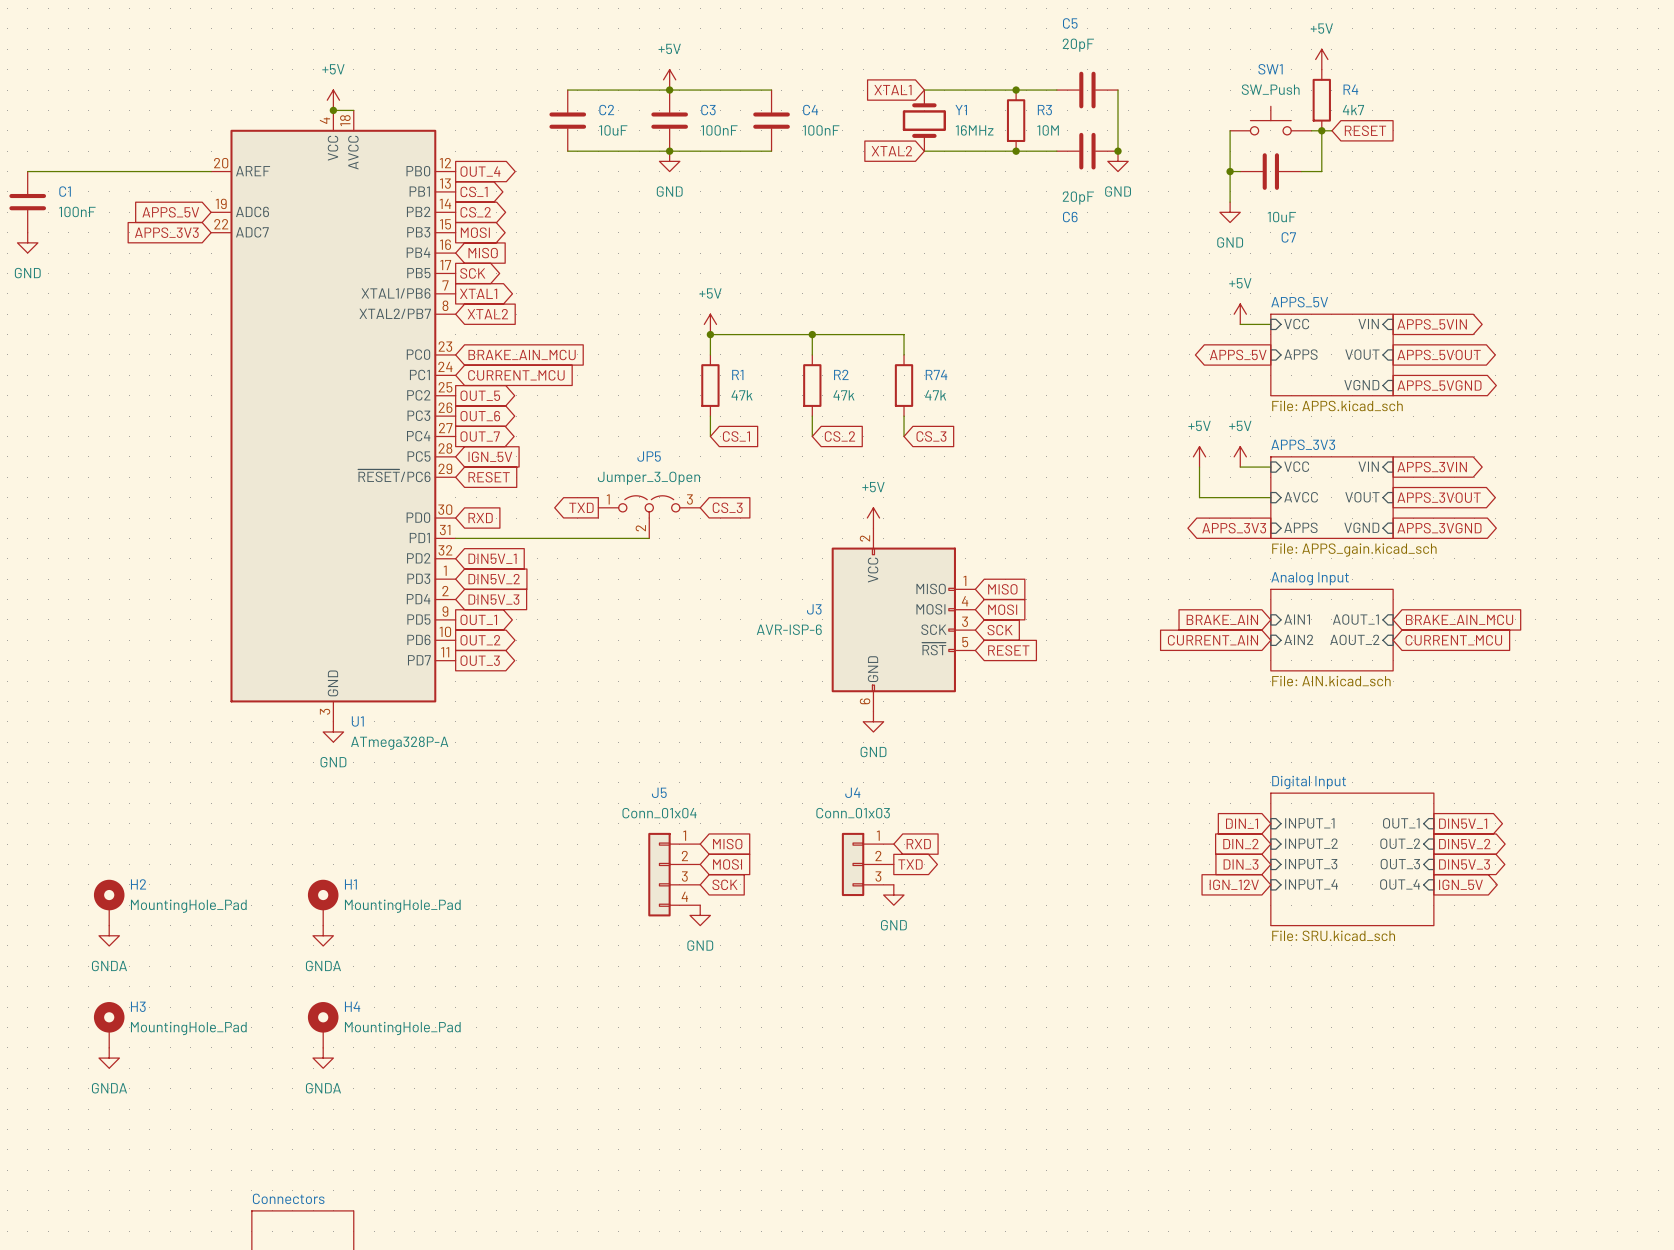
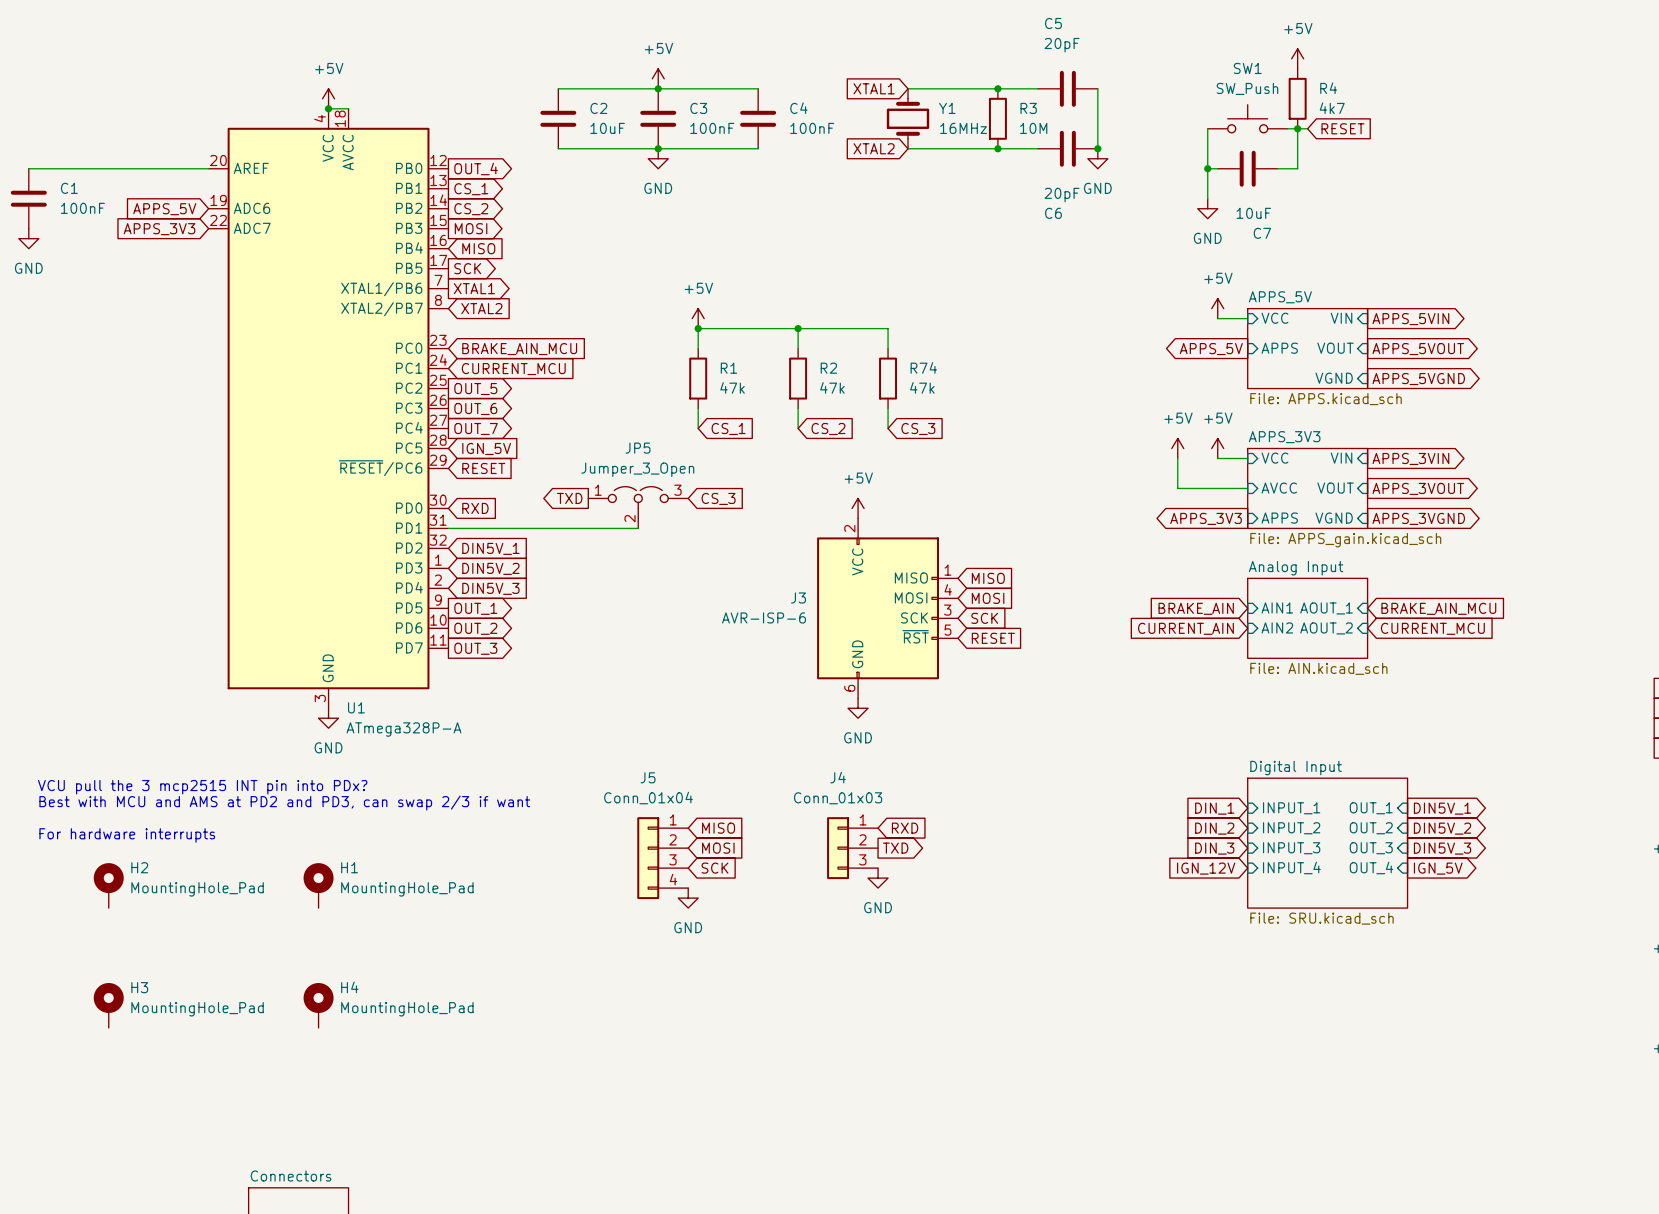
text: none -> VCU pull the 3 mcp2515 INT pin into PDx? (202, 787)
text: none -> Best with MCU and AMS at PD2 and PD3, can swap 2/3 if want (284, 803)
text: none -> For hardware interrupts (127, 835)
power symbol: GNDA (109, 935) -> none
power symbol: GNDA (323, 935) -> none
power symbol: GNDA (109, 1058) -> none
power symbol: GNDA (323, 1058) -> none

